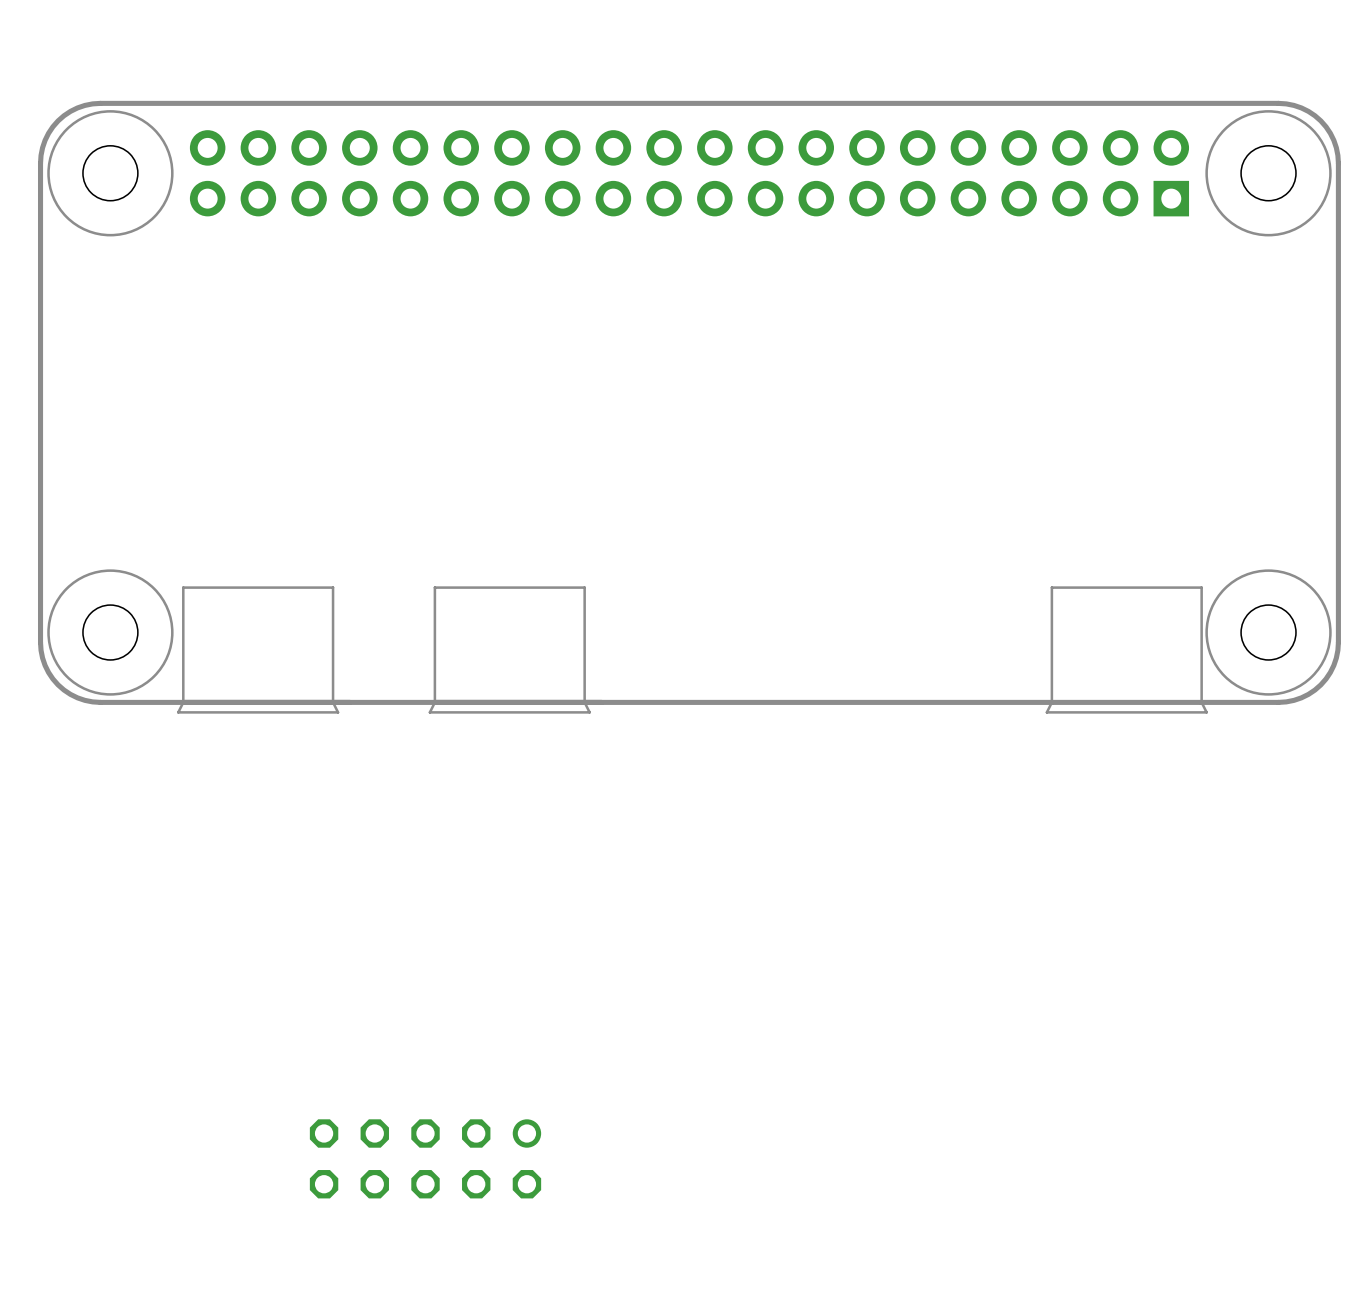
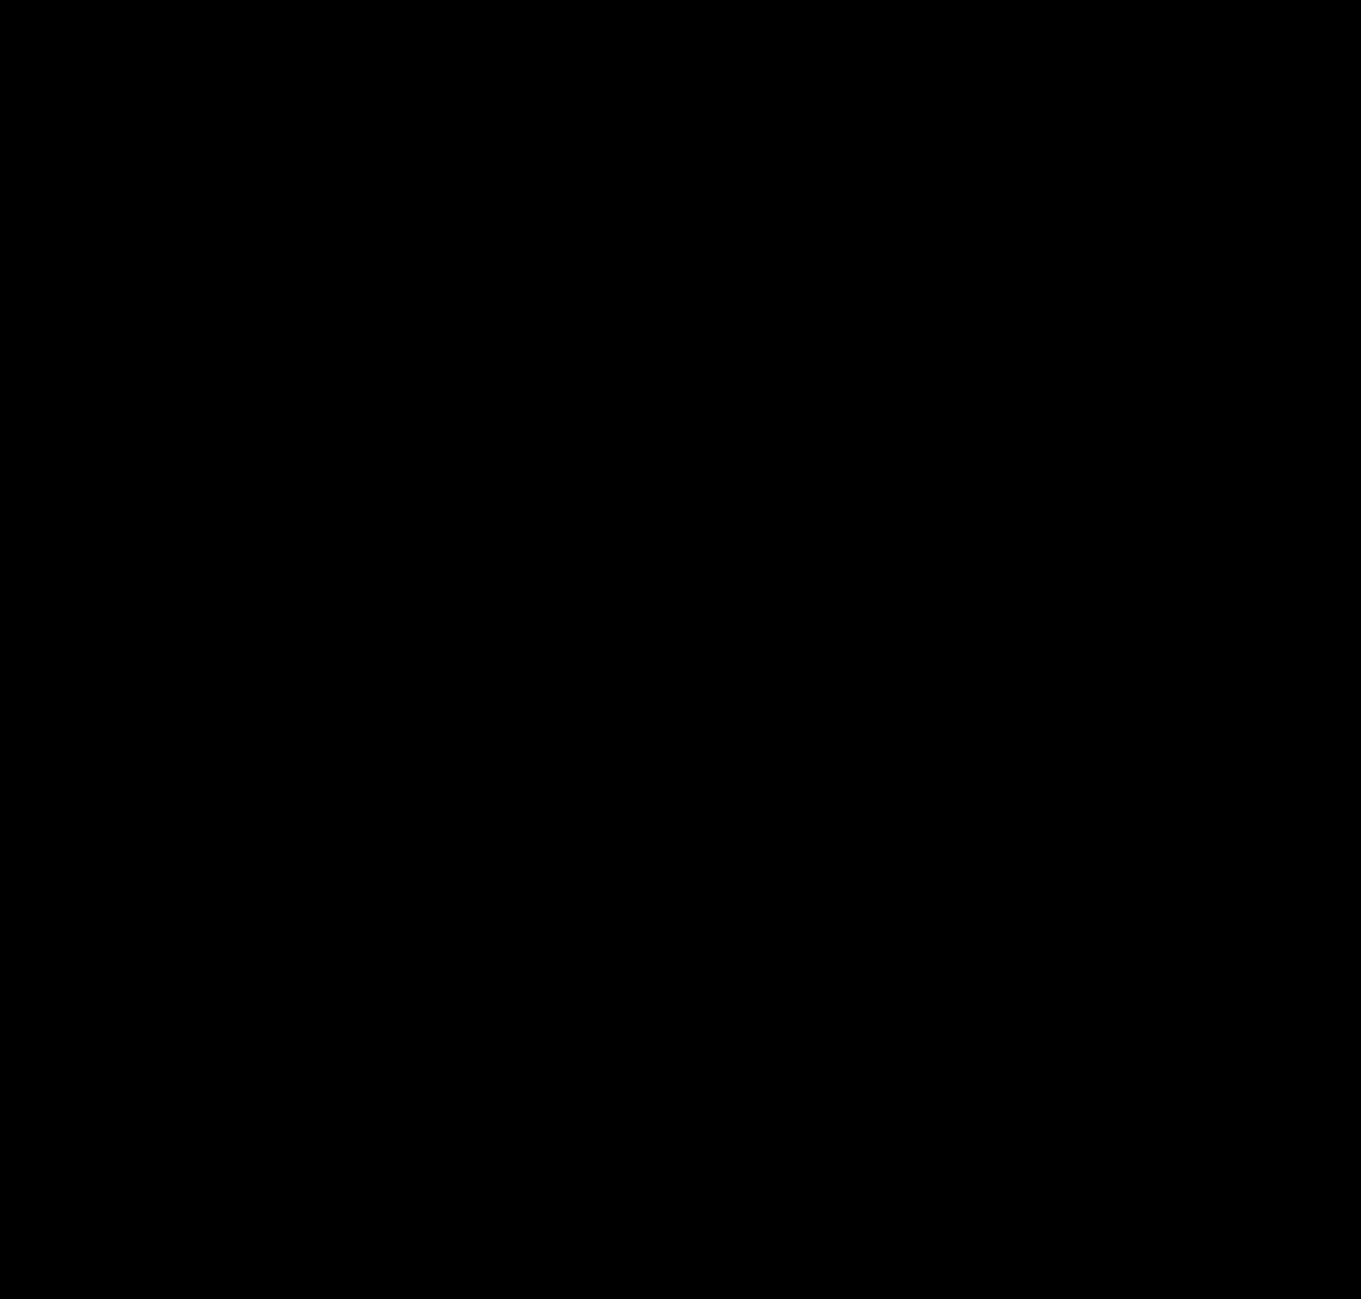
part: (689, 407) -> none
part: (425, 1158) -> none

